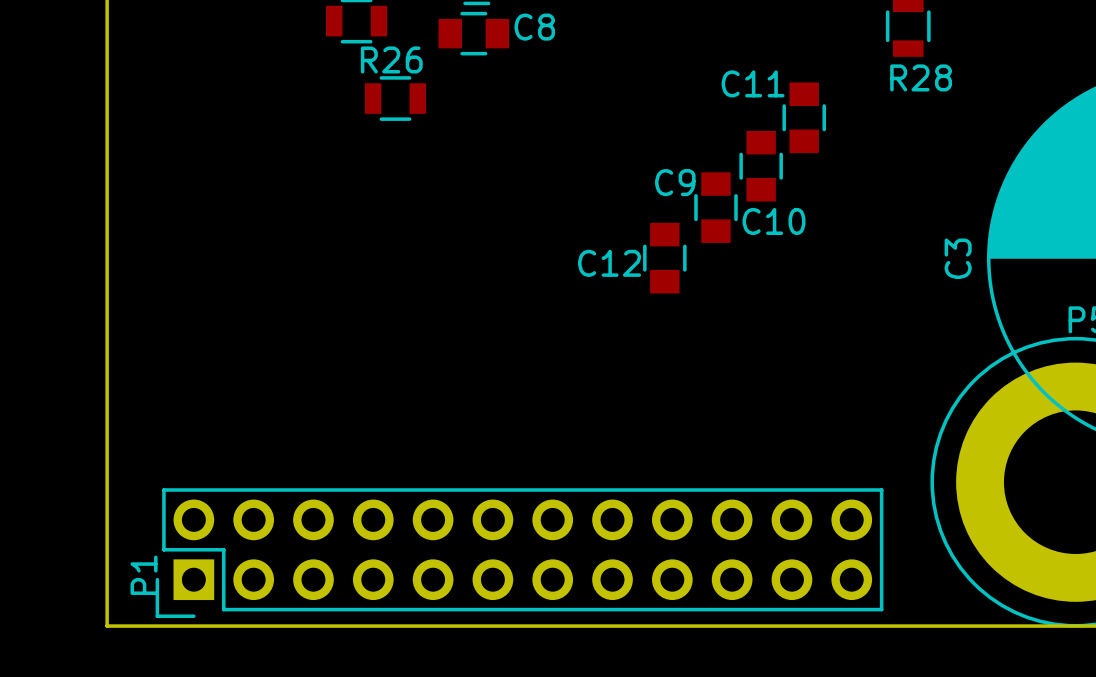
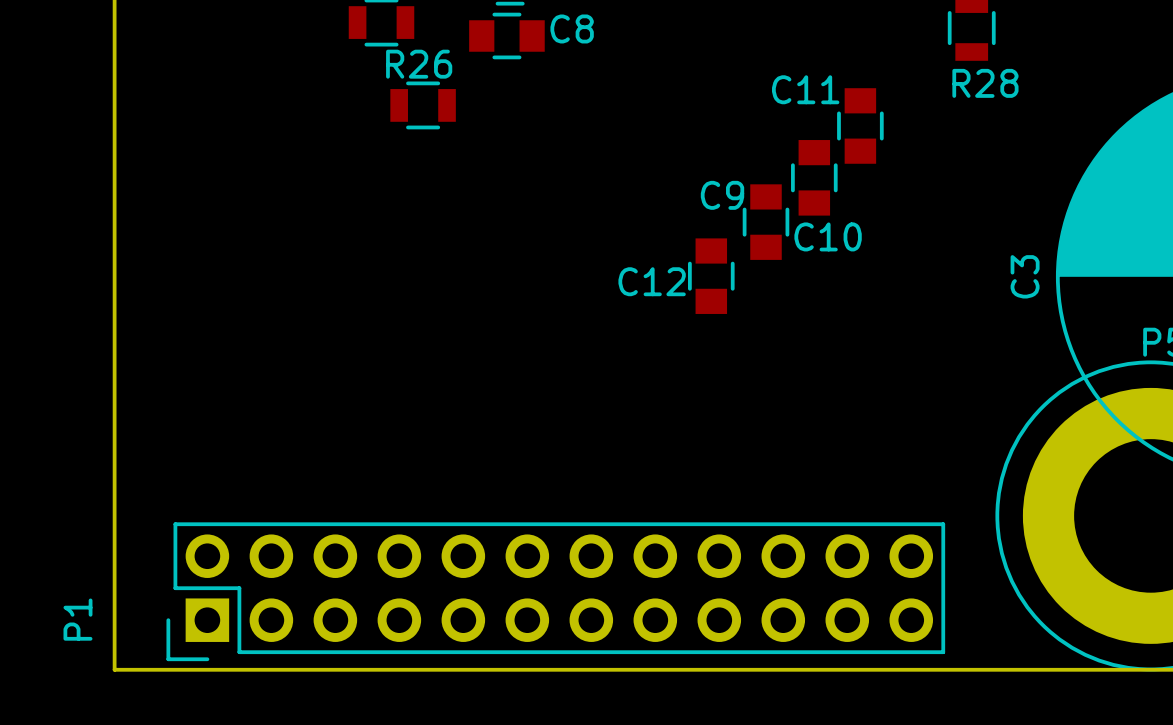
P1 name position: P1 (144, 575) -> P1 (77, 619)

